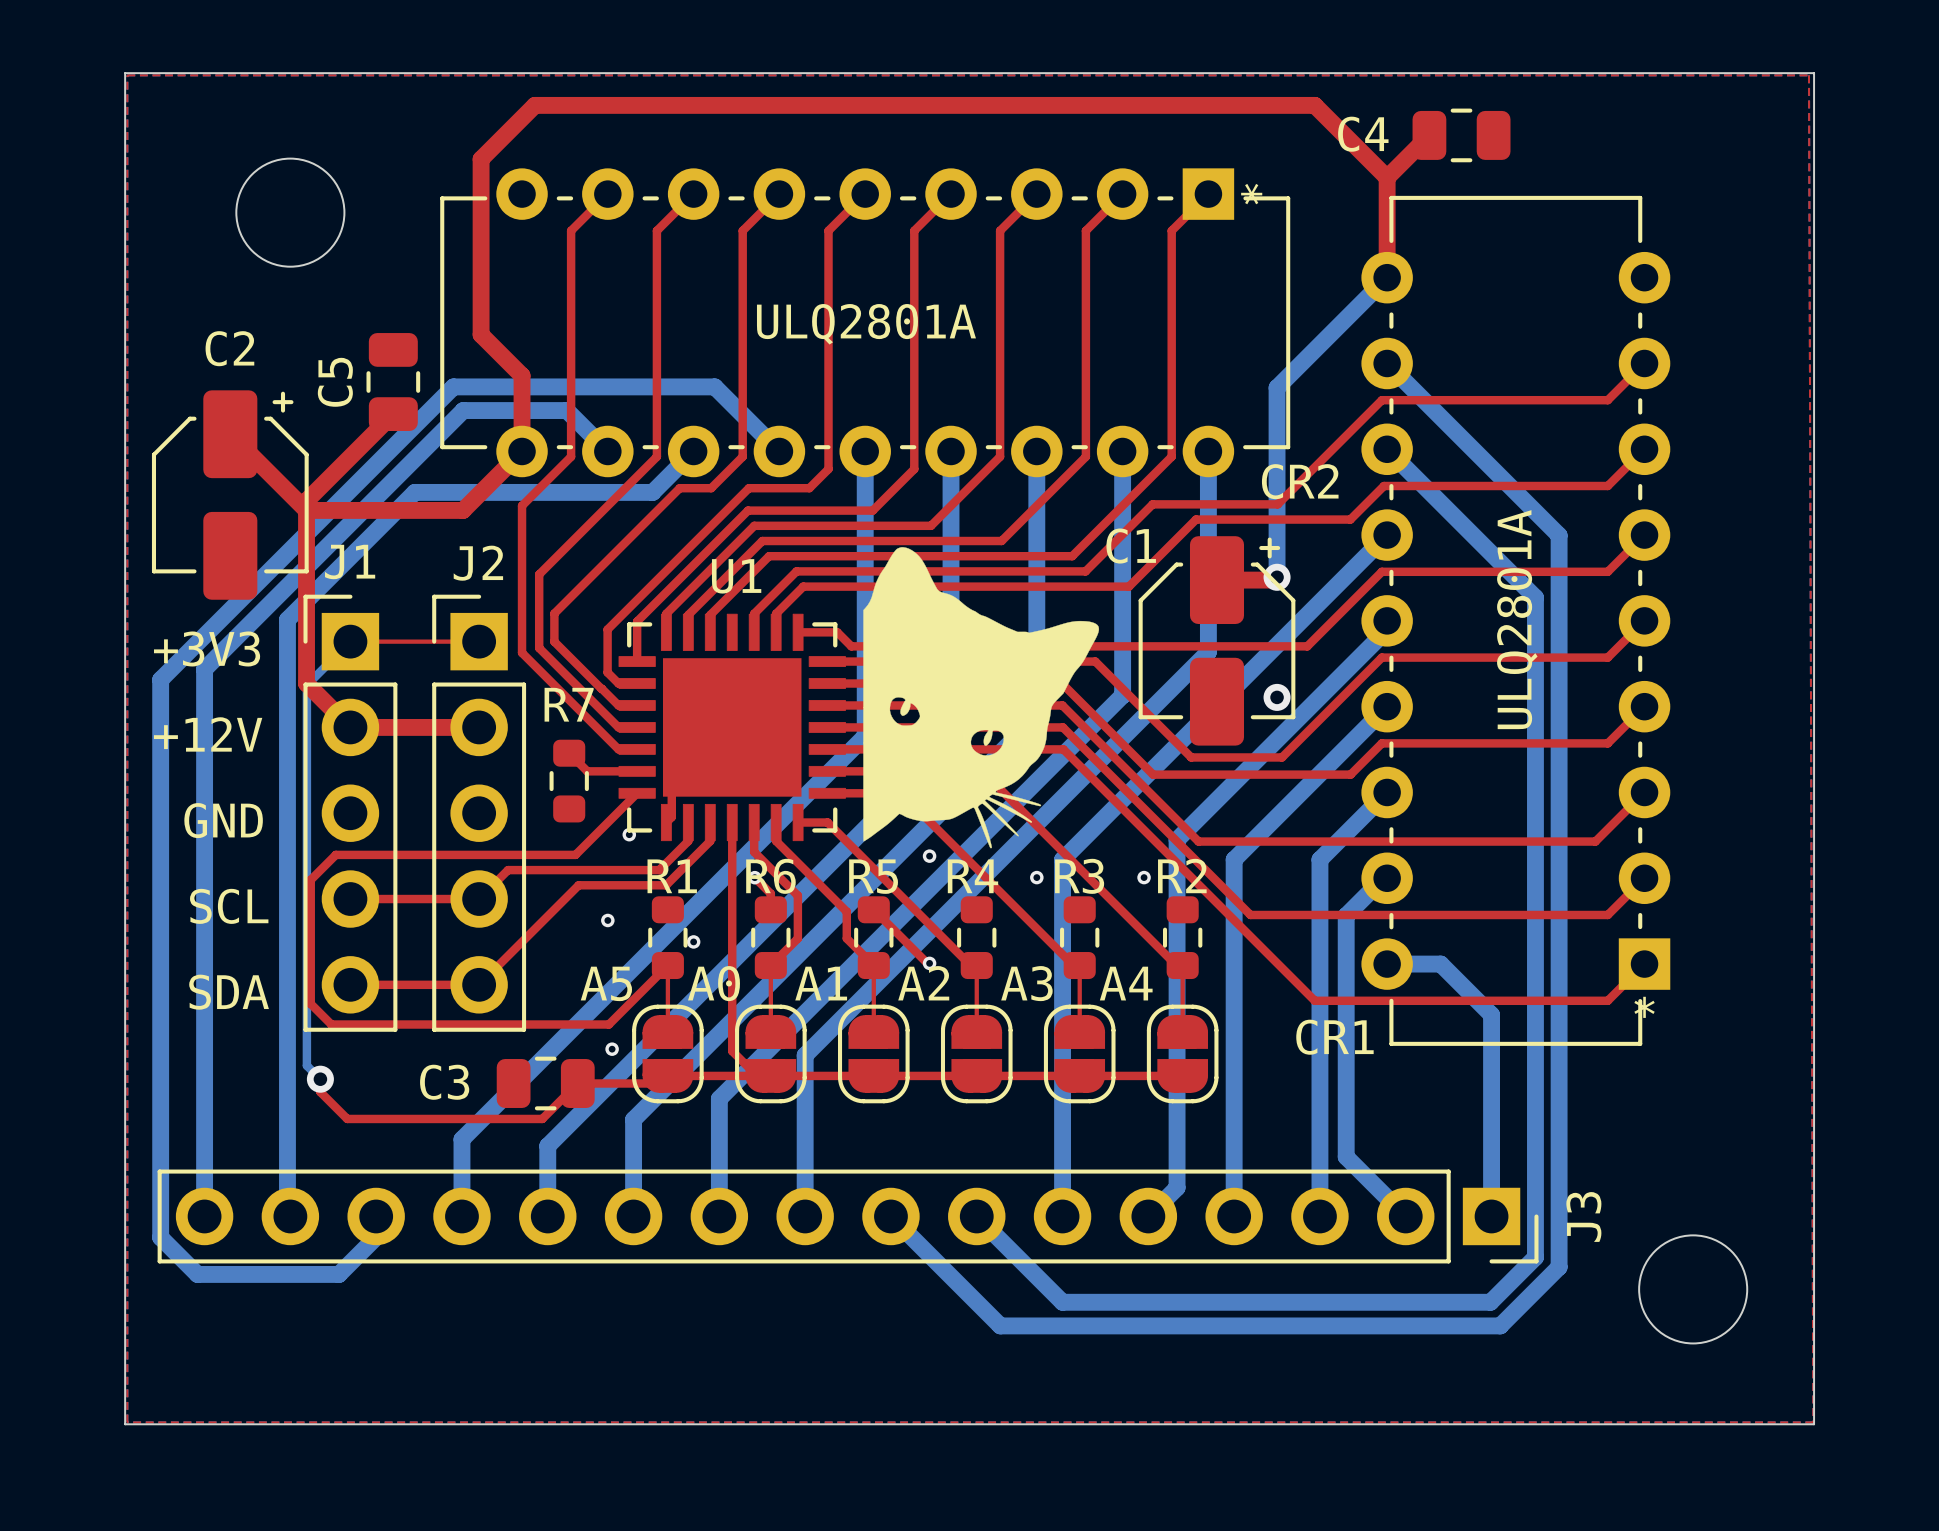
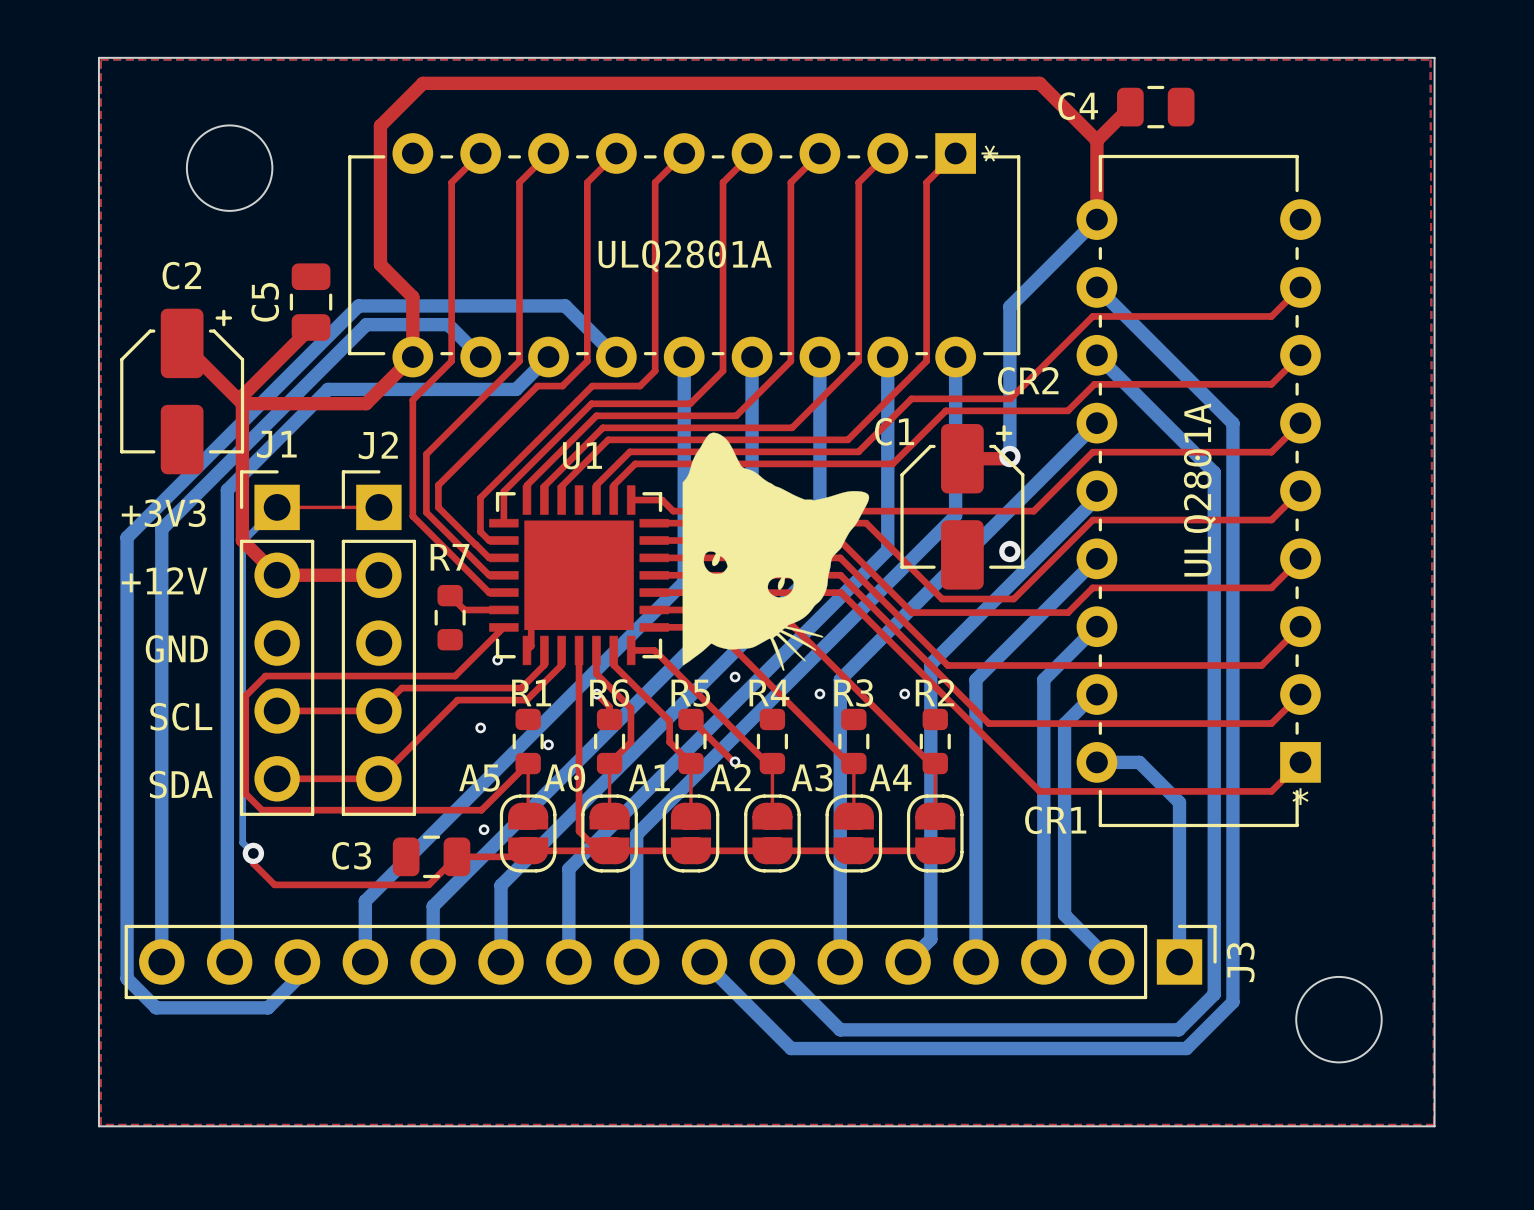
J3 footprint: [157, 1169, 1539, 1264] -> [124, 924, 1217, 1000]

